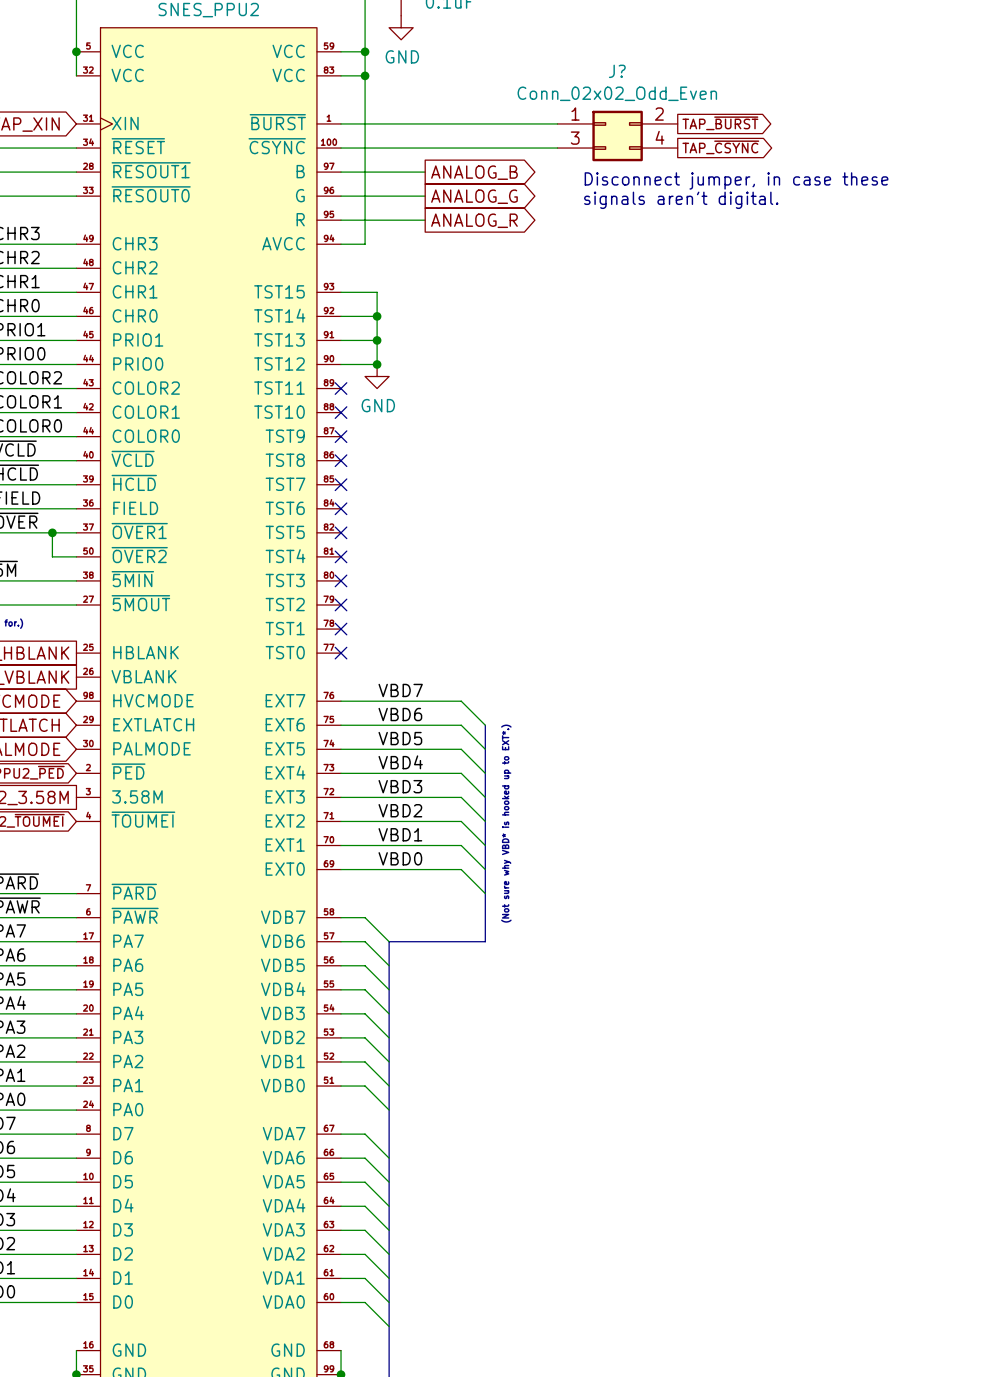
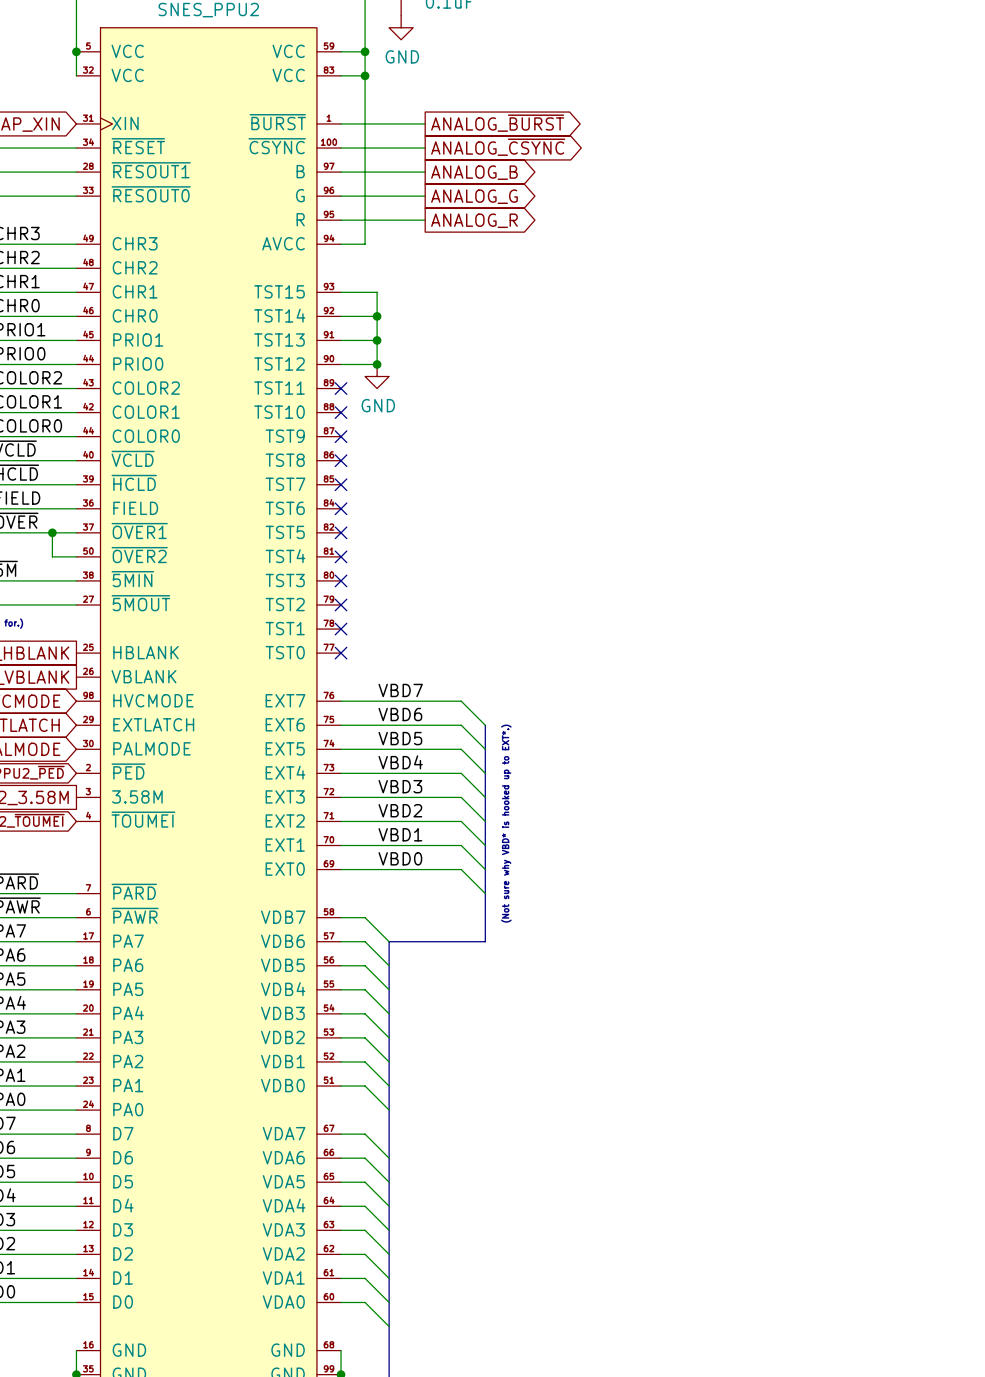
wire: (425, 123) (557, 123) -> none
global label: none -> ANALOG_~{BURST} (497, 123)
global label: TAP_~{BURST} (720, 123) -> none
J?: Conn_02x02_Odd_Even (617, 136) -> none
global label: none -> ANALOG_~{CSYNC} (498, 147)
global label: TAP_~{CSYNC} (720, 147) -> none
wire: (425, 148) (557, 148) -> none
text: Disconnect jumper, in case these (736, 180) -> none
text: signals aren't digital. (681, 200) -> none

